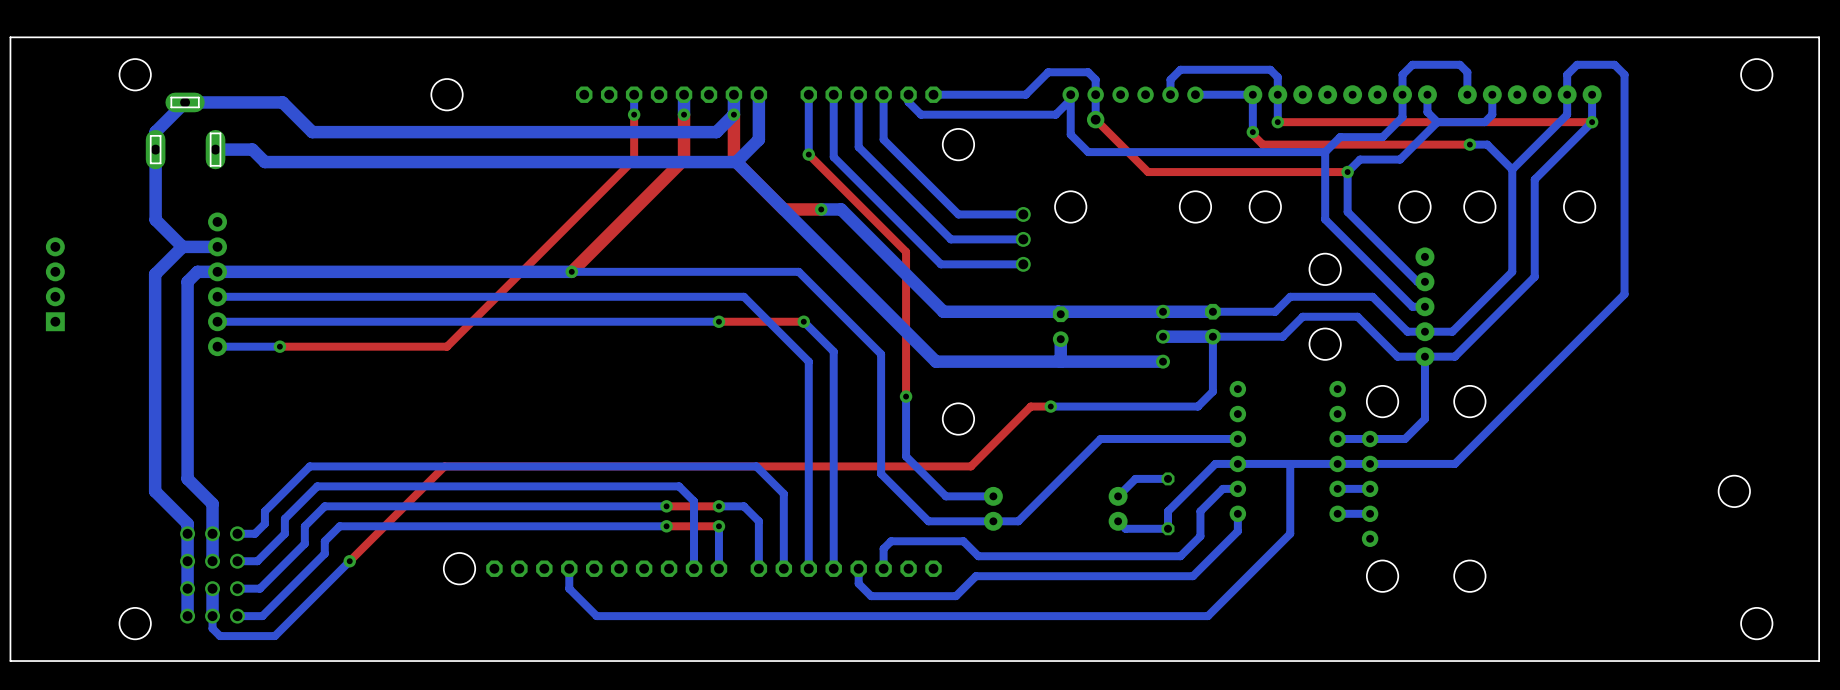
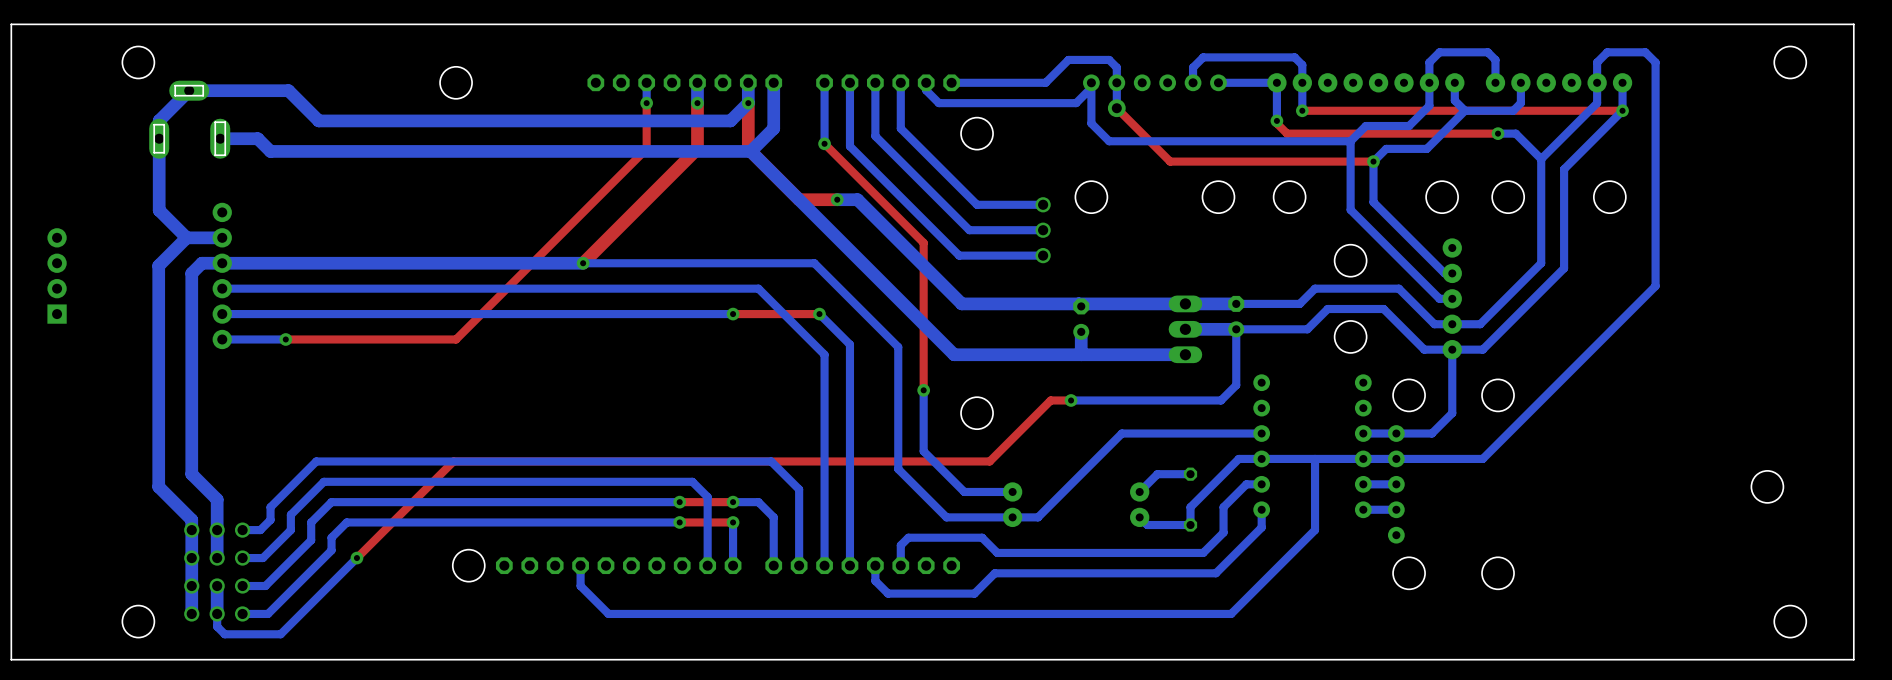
part footprint: [1156, 304, 1171, 369] -> [1168, 295, 1203, 364]

